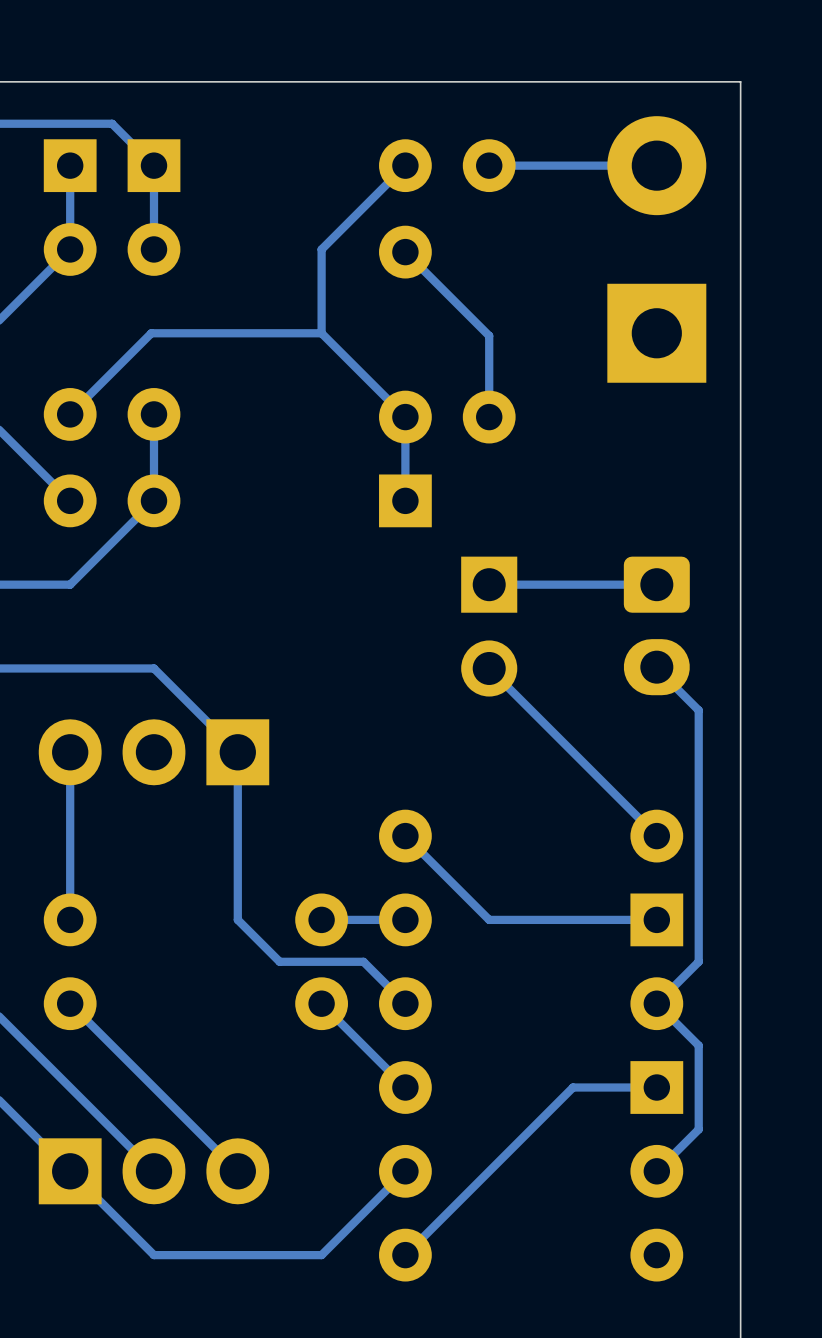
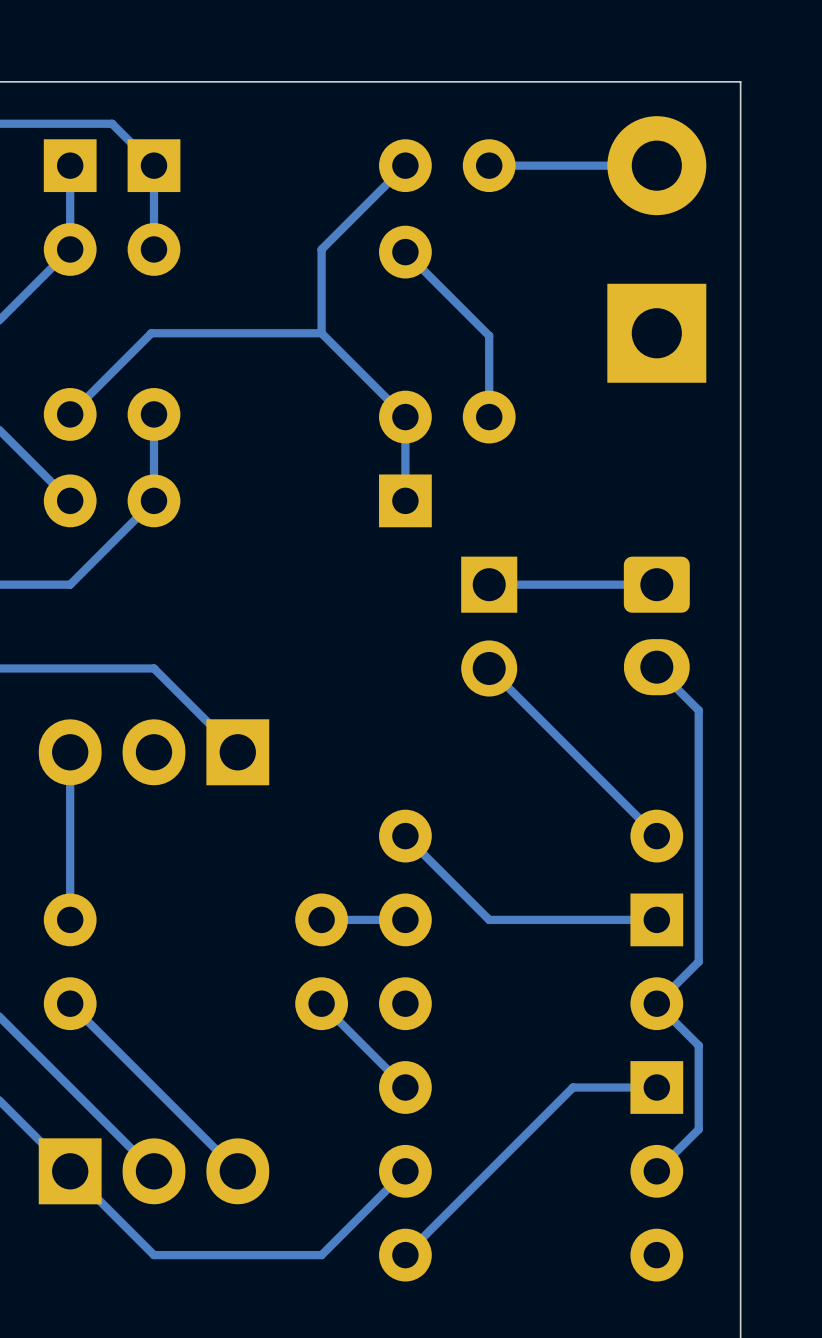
track: (237, 752) (237, 919) (279, 961) (363, 961) (405, 1003) -> none

